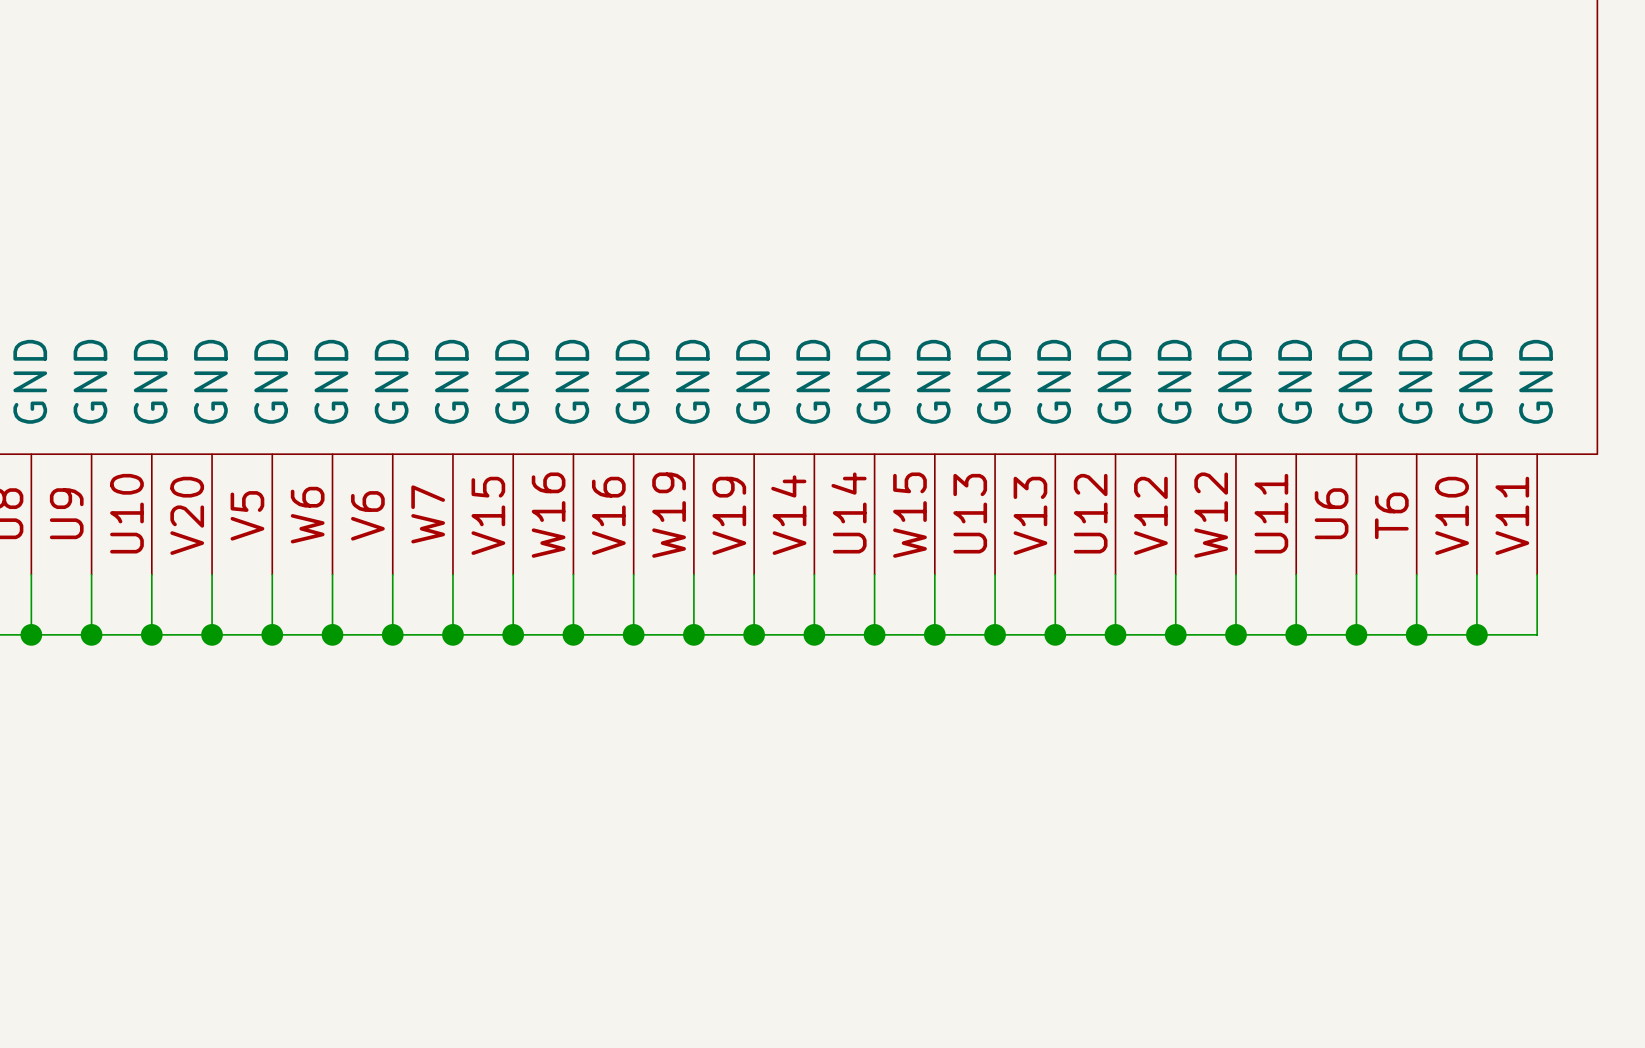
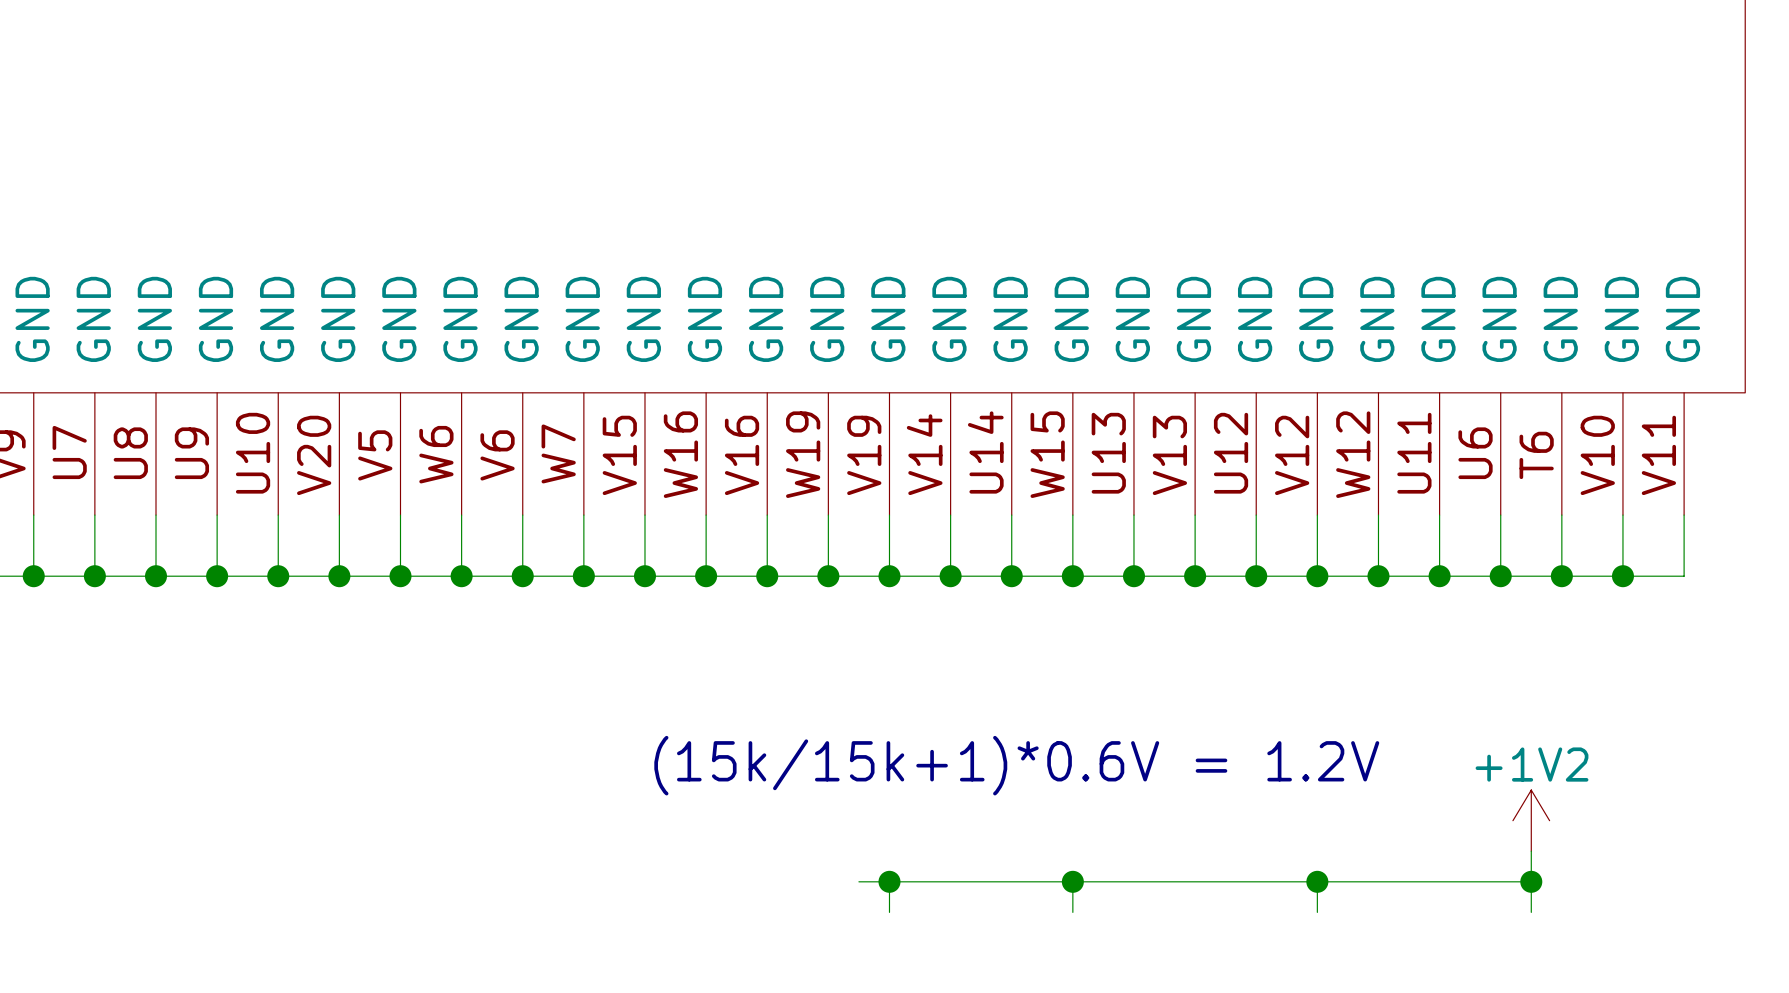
text: none -> (15k/15k+1)*0.6V = 1.2V (1016, 765)
power symbol: none -> +1V2 (1531, 820)
wire: none -> (1531, 851) (1531, 912)
wire: none -> (858, 881) (1531, 881)
wire: none -> (889, 881) (889, 912)
junction: none -> (889, 881)
wire: none -> (1072, 881) (1072, 912)
junction: none -> (1072, 881)
wire: none -> (1317, 881) (1317, 912)
junction: none -> (1317, 881)
junction: none -> (1531, 881)

